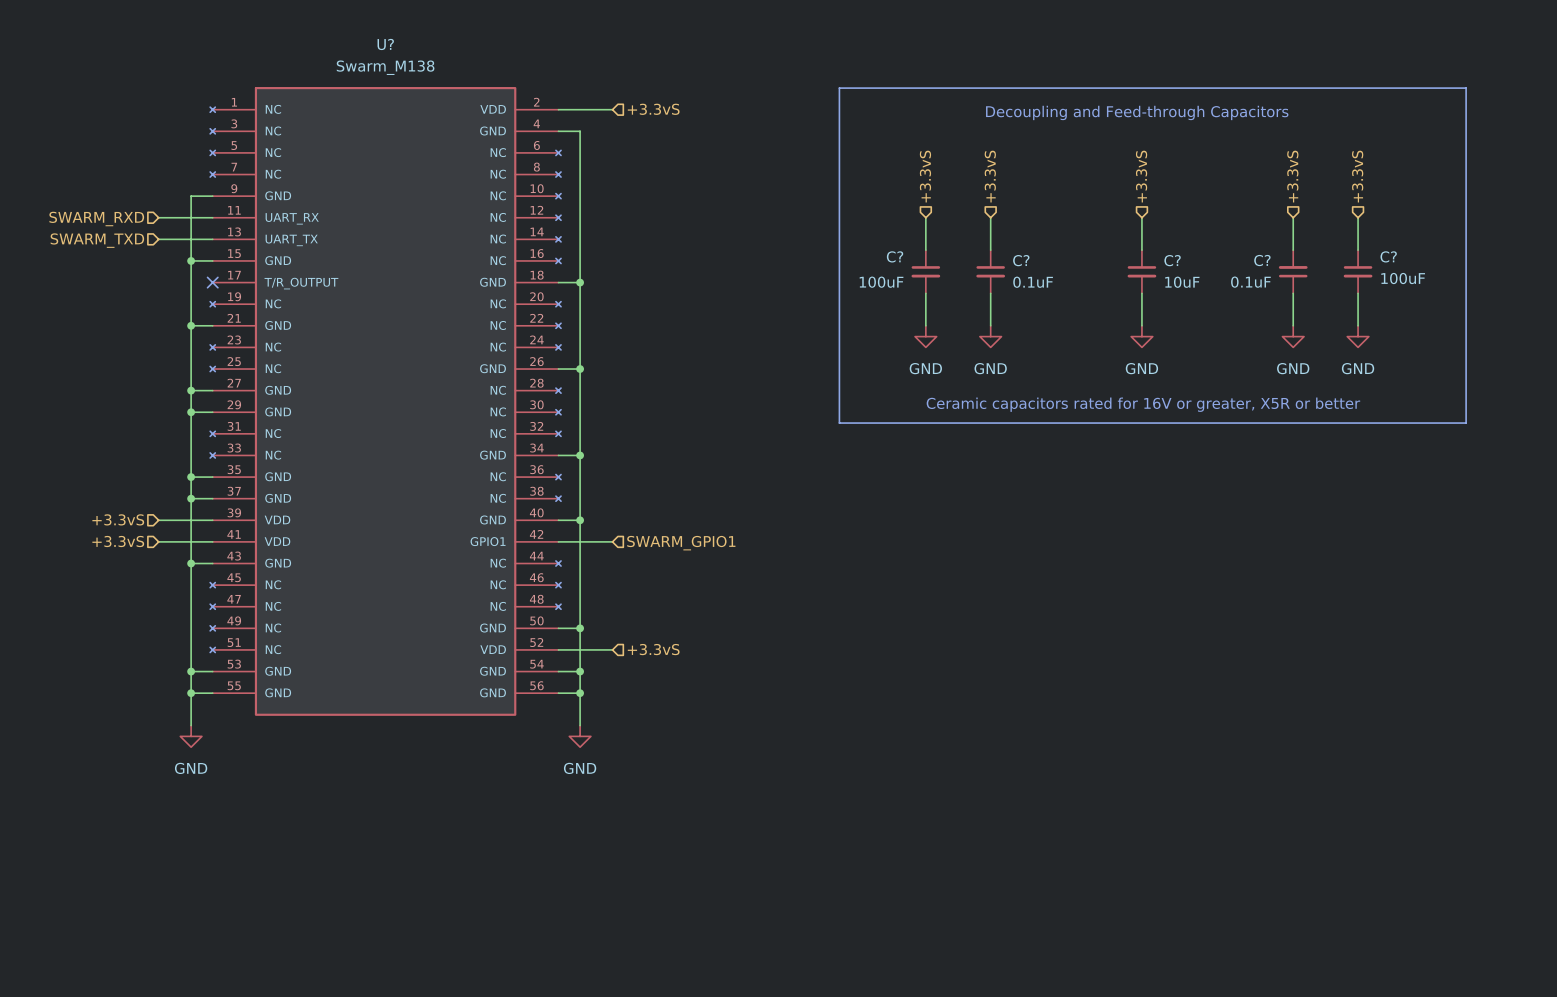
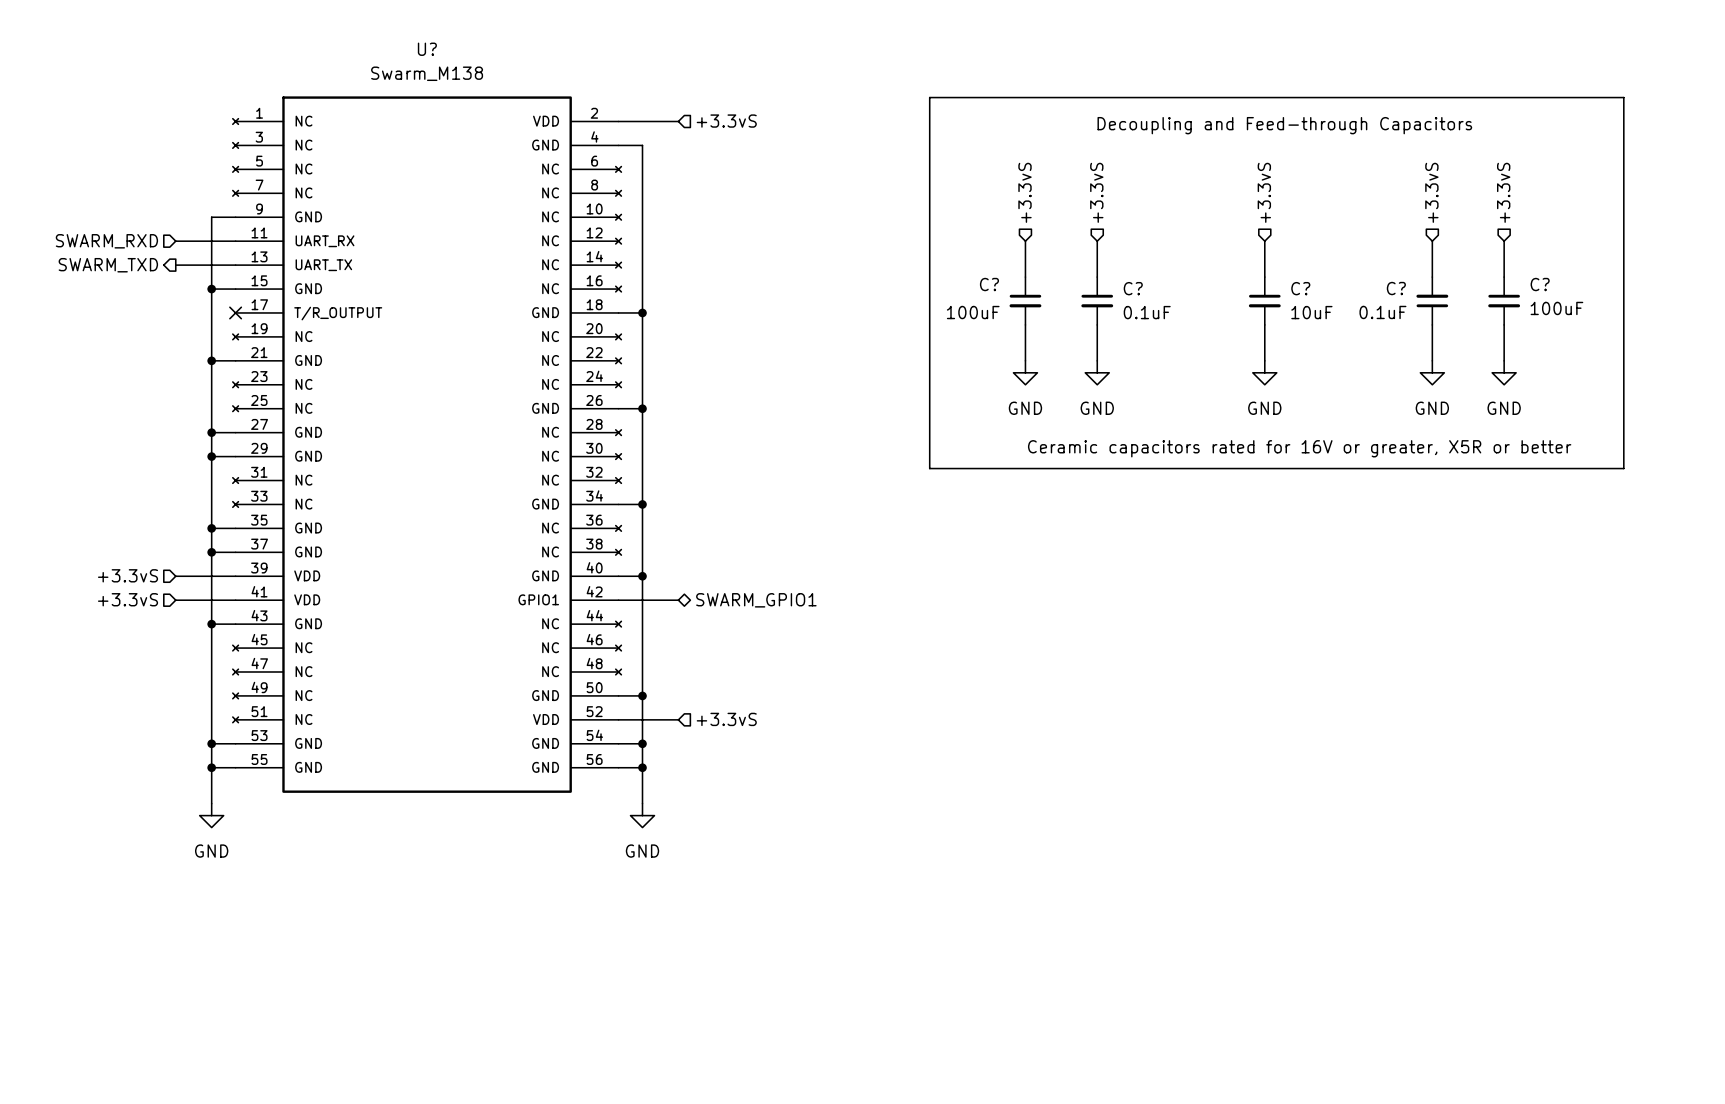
hierarchical label shape: input (97, 240) -> output (108, 265)
hierarchical label shape: input (681, 543) -> bidirectional (756, 600)

